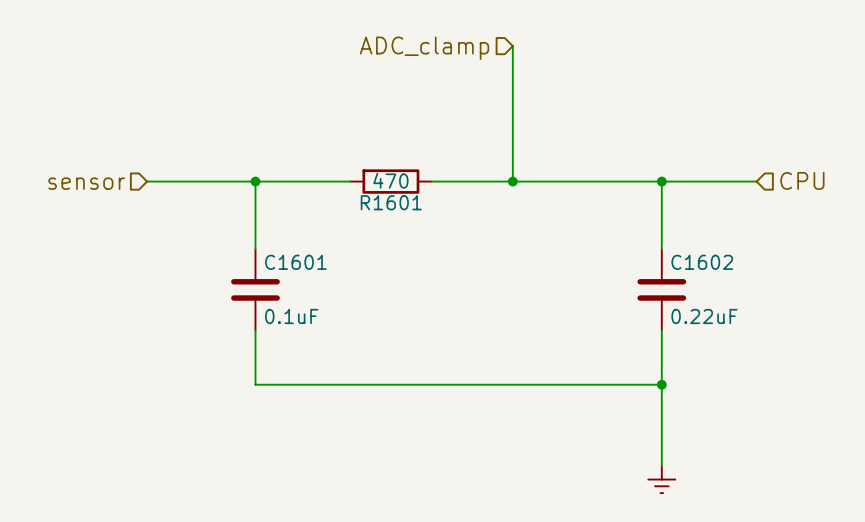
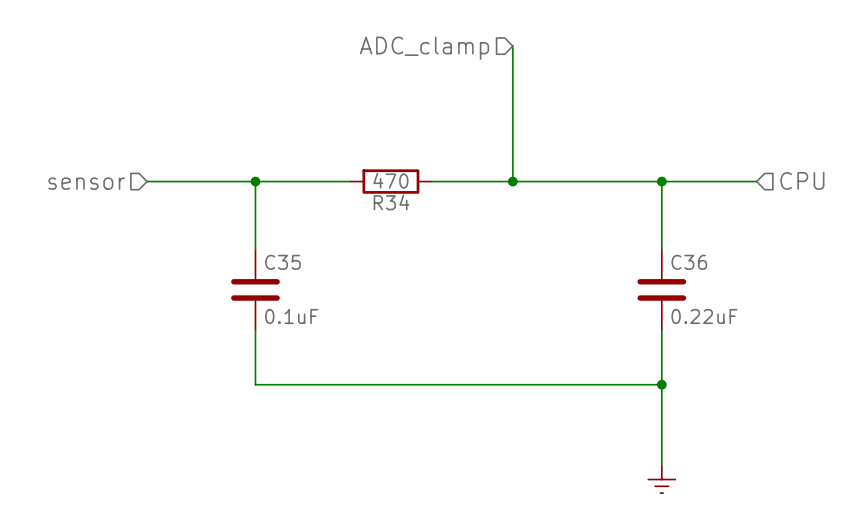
R1601 name: R1601 (391, 202) -> R34 (391, 202)
C1601 name: C1601 (295, 262) -> C35 (282, 262)
C1602 name: C1602 (702, 262) -> C36 (689, 262)

